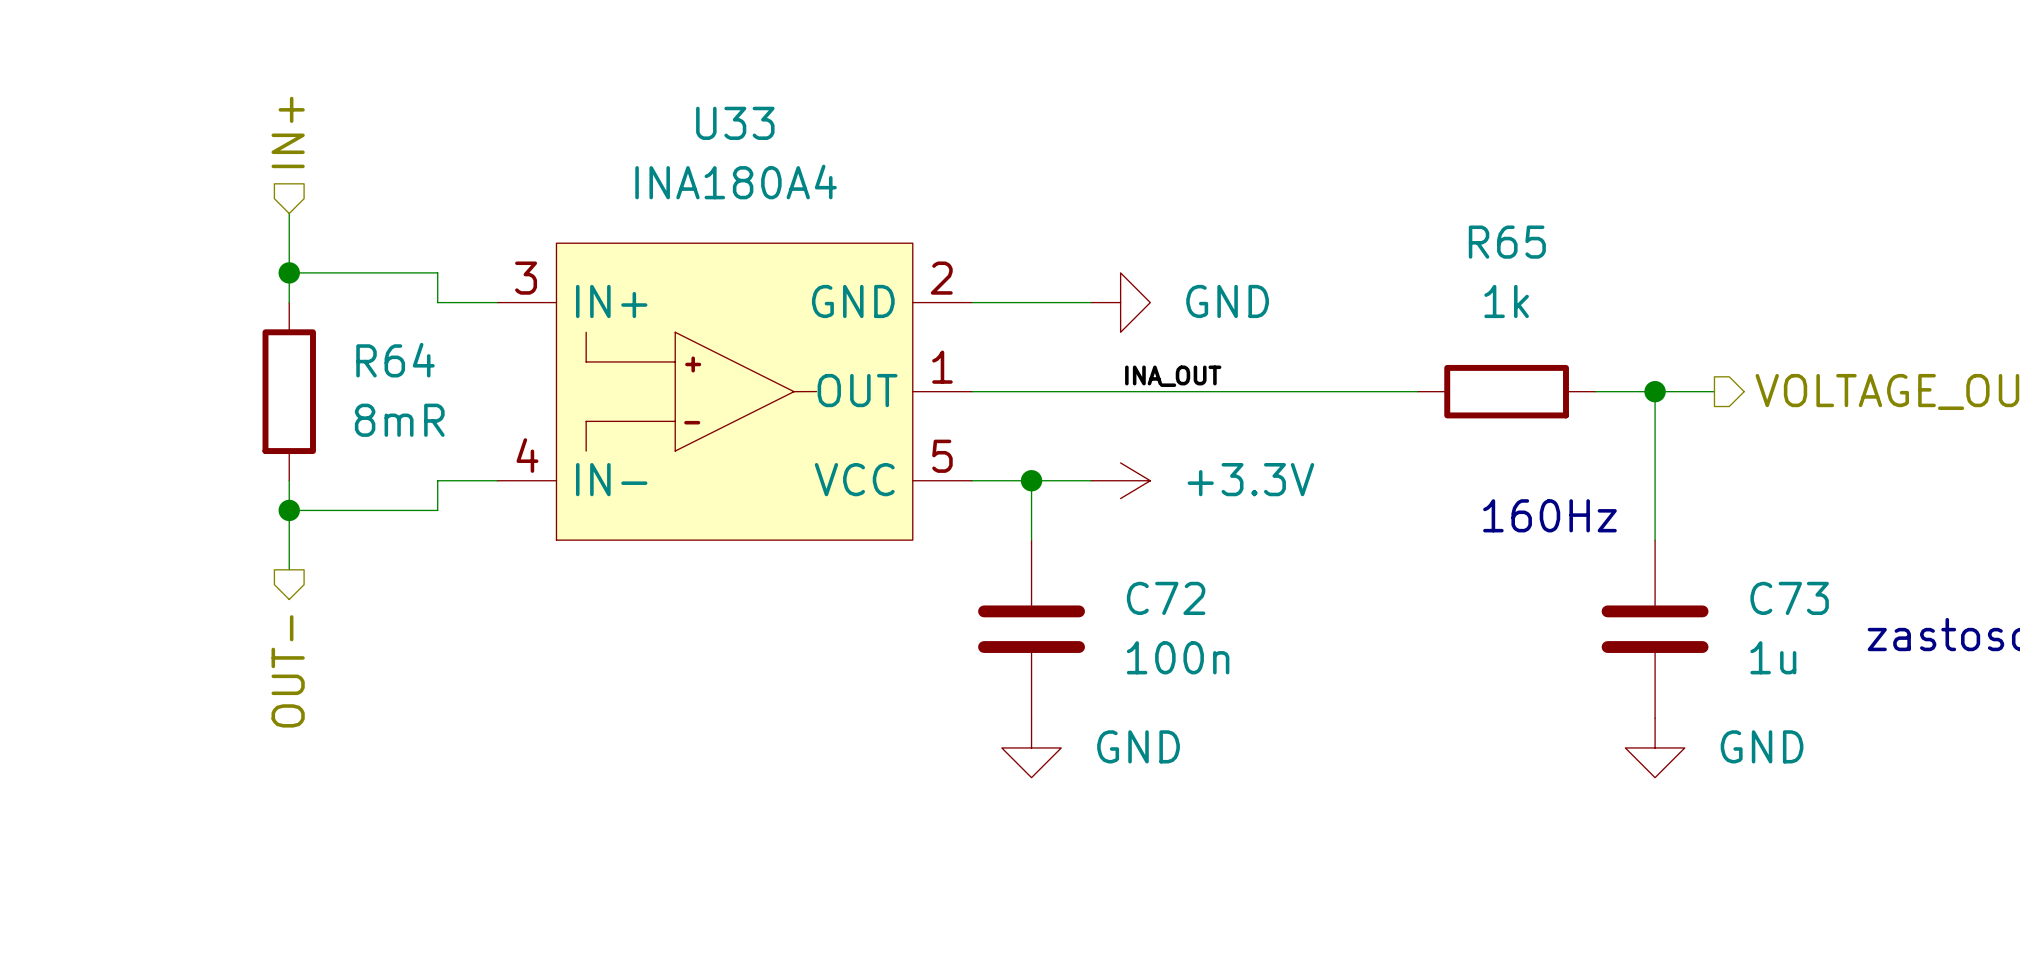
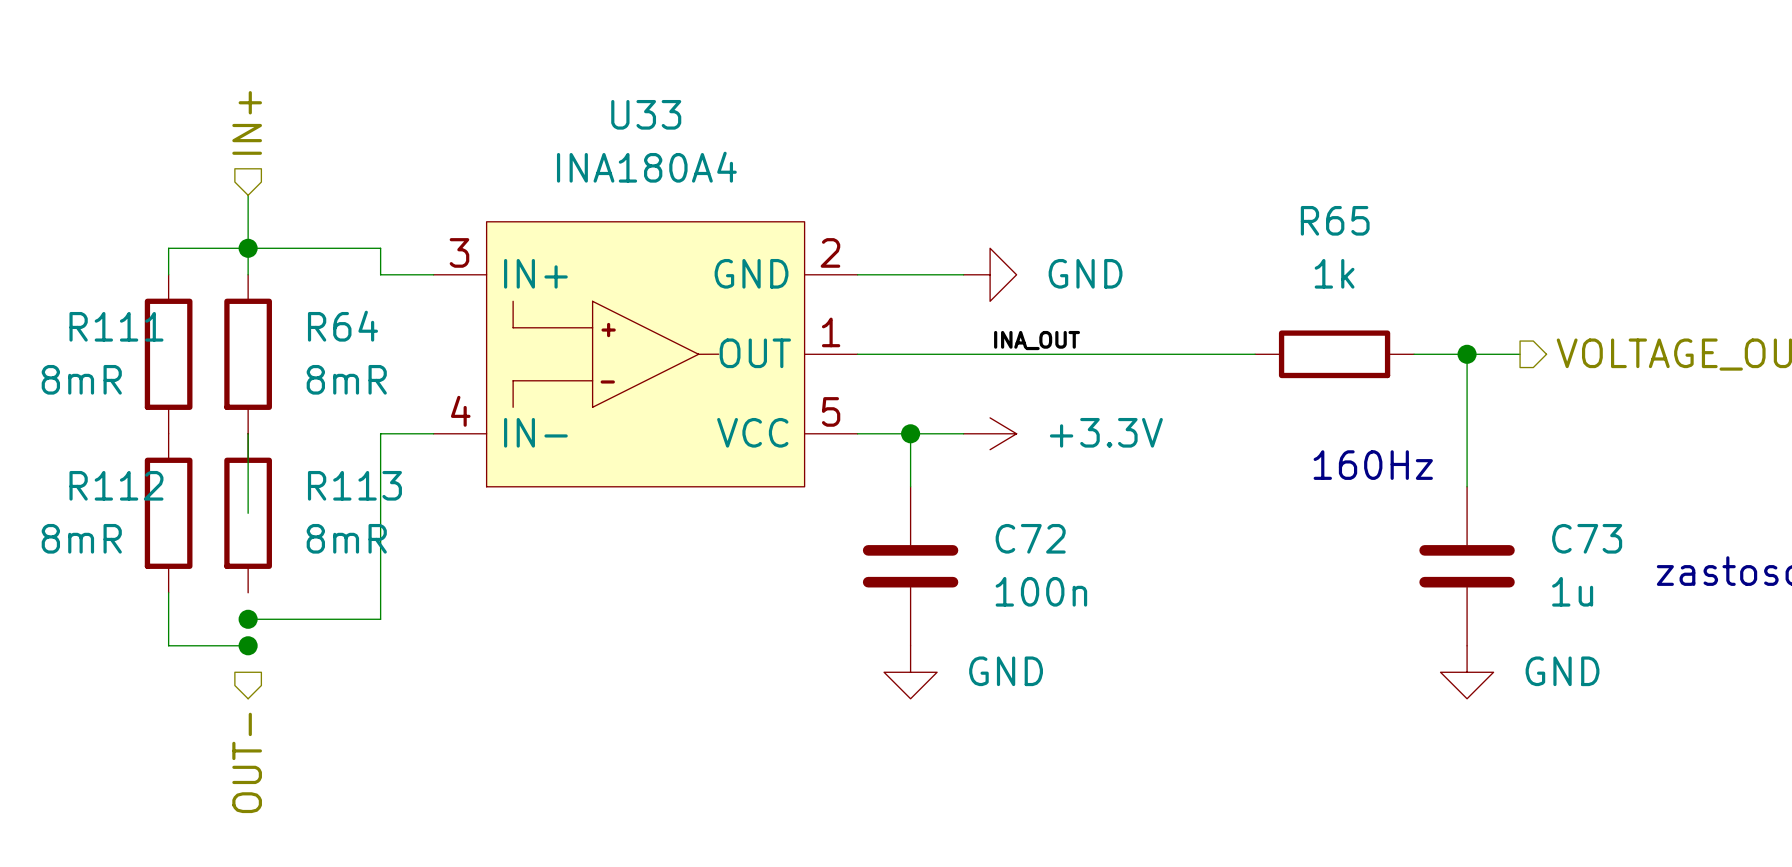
wire: none -> (248, 248) (168, 248) (168, 274)
R111: none -> 8mR (168, 354)
wire: (289, 510) (437, 510) -> (248, 619) (380, 619) (380, 460)
junction: (289, 510) -> none
R112: none -> 8mR (168, 513)
R113: none -> 8mR (248, 513)
wire: none -> (168, 592) (168, 645) (248, 645)
hierarchical label position: OUT- (288, 671) -> OUT- (247, 762)
junction: none -> (248, 619)
junction: none -> (248, 645)

